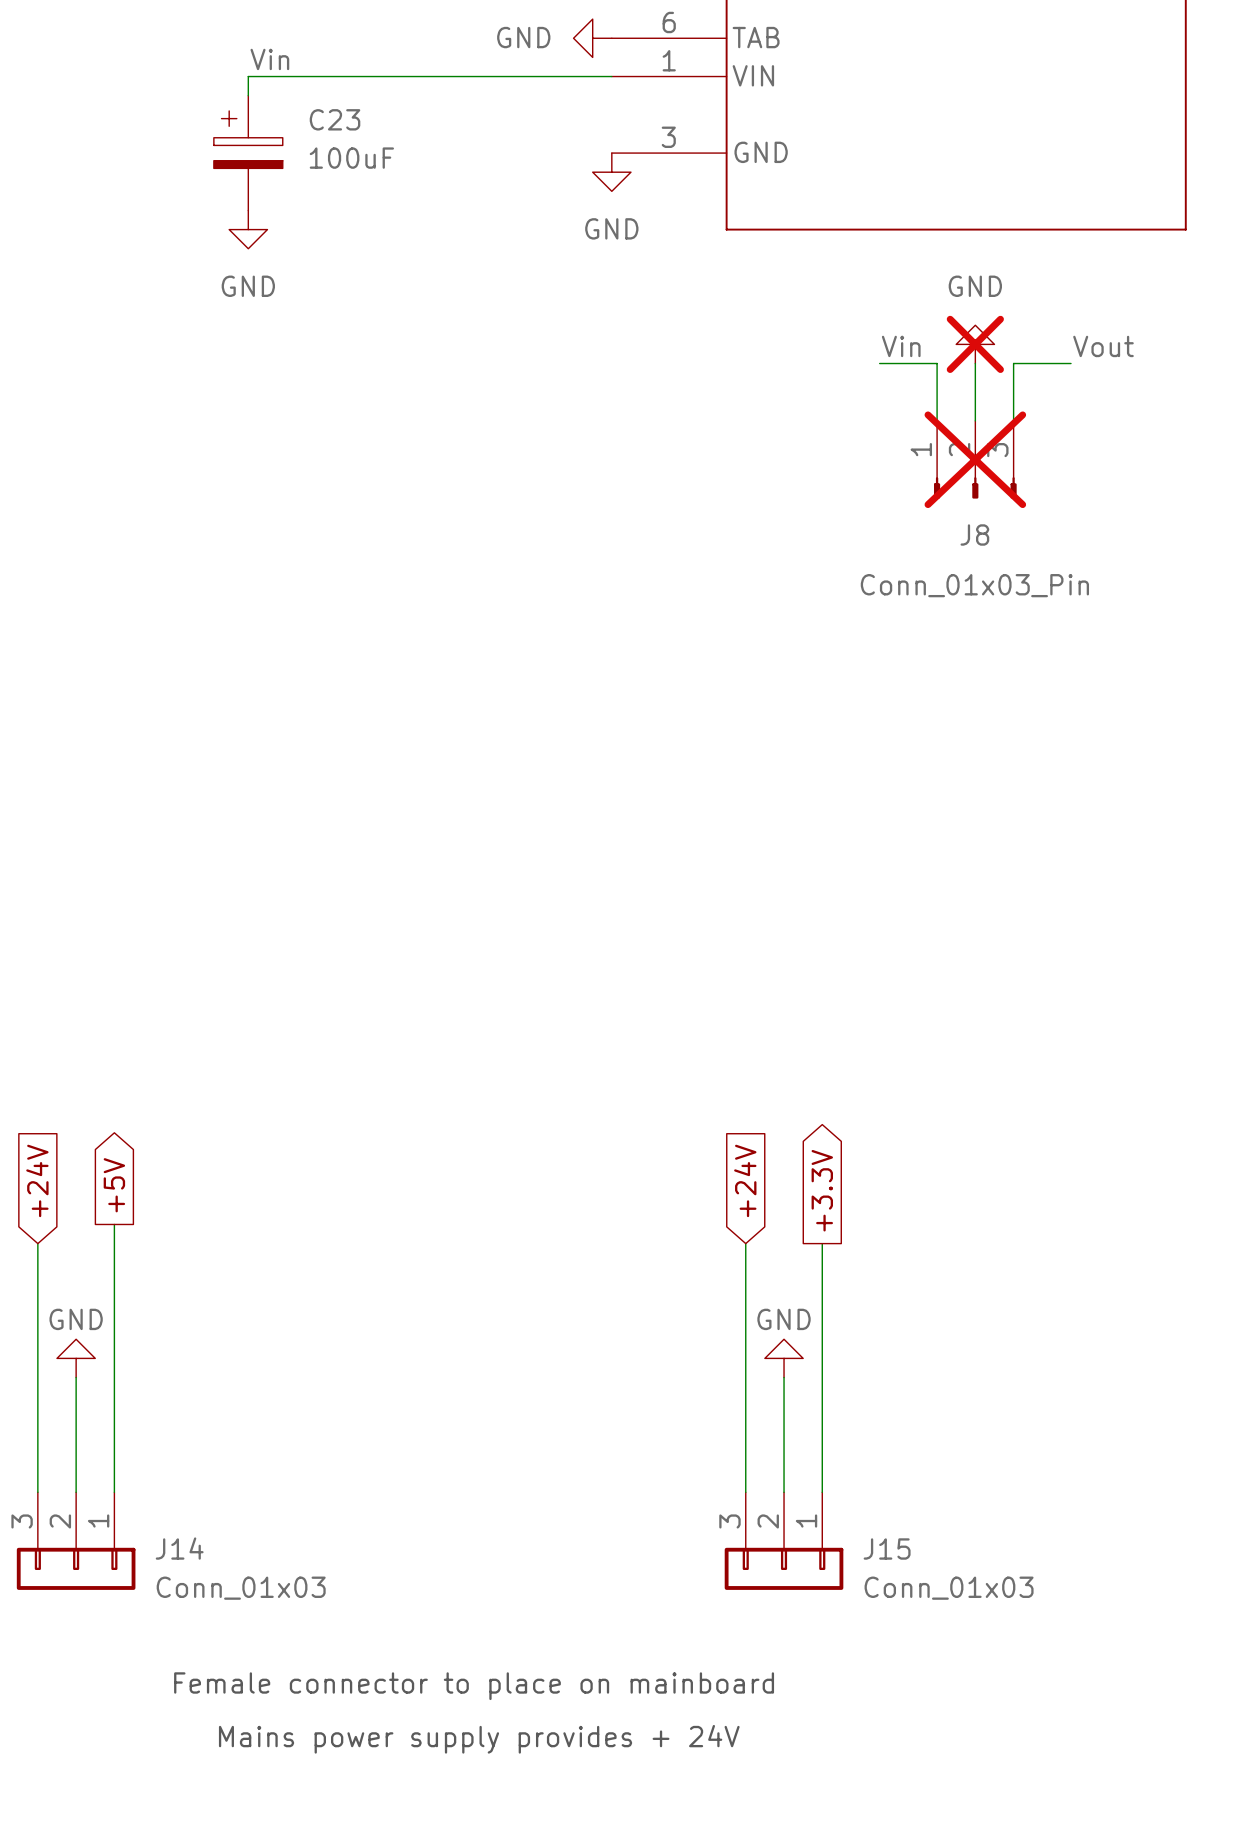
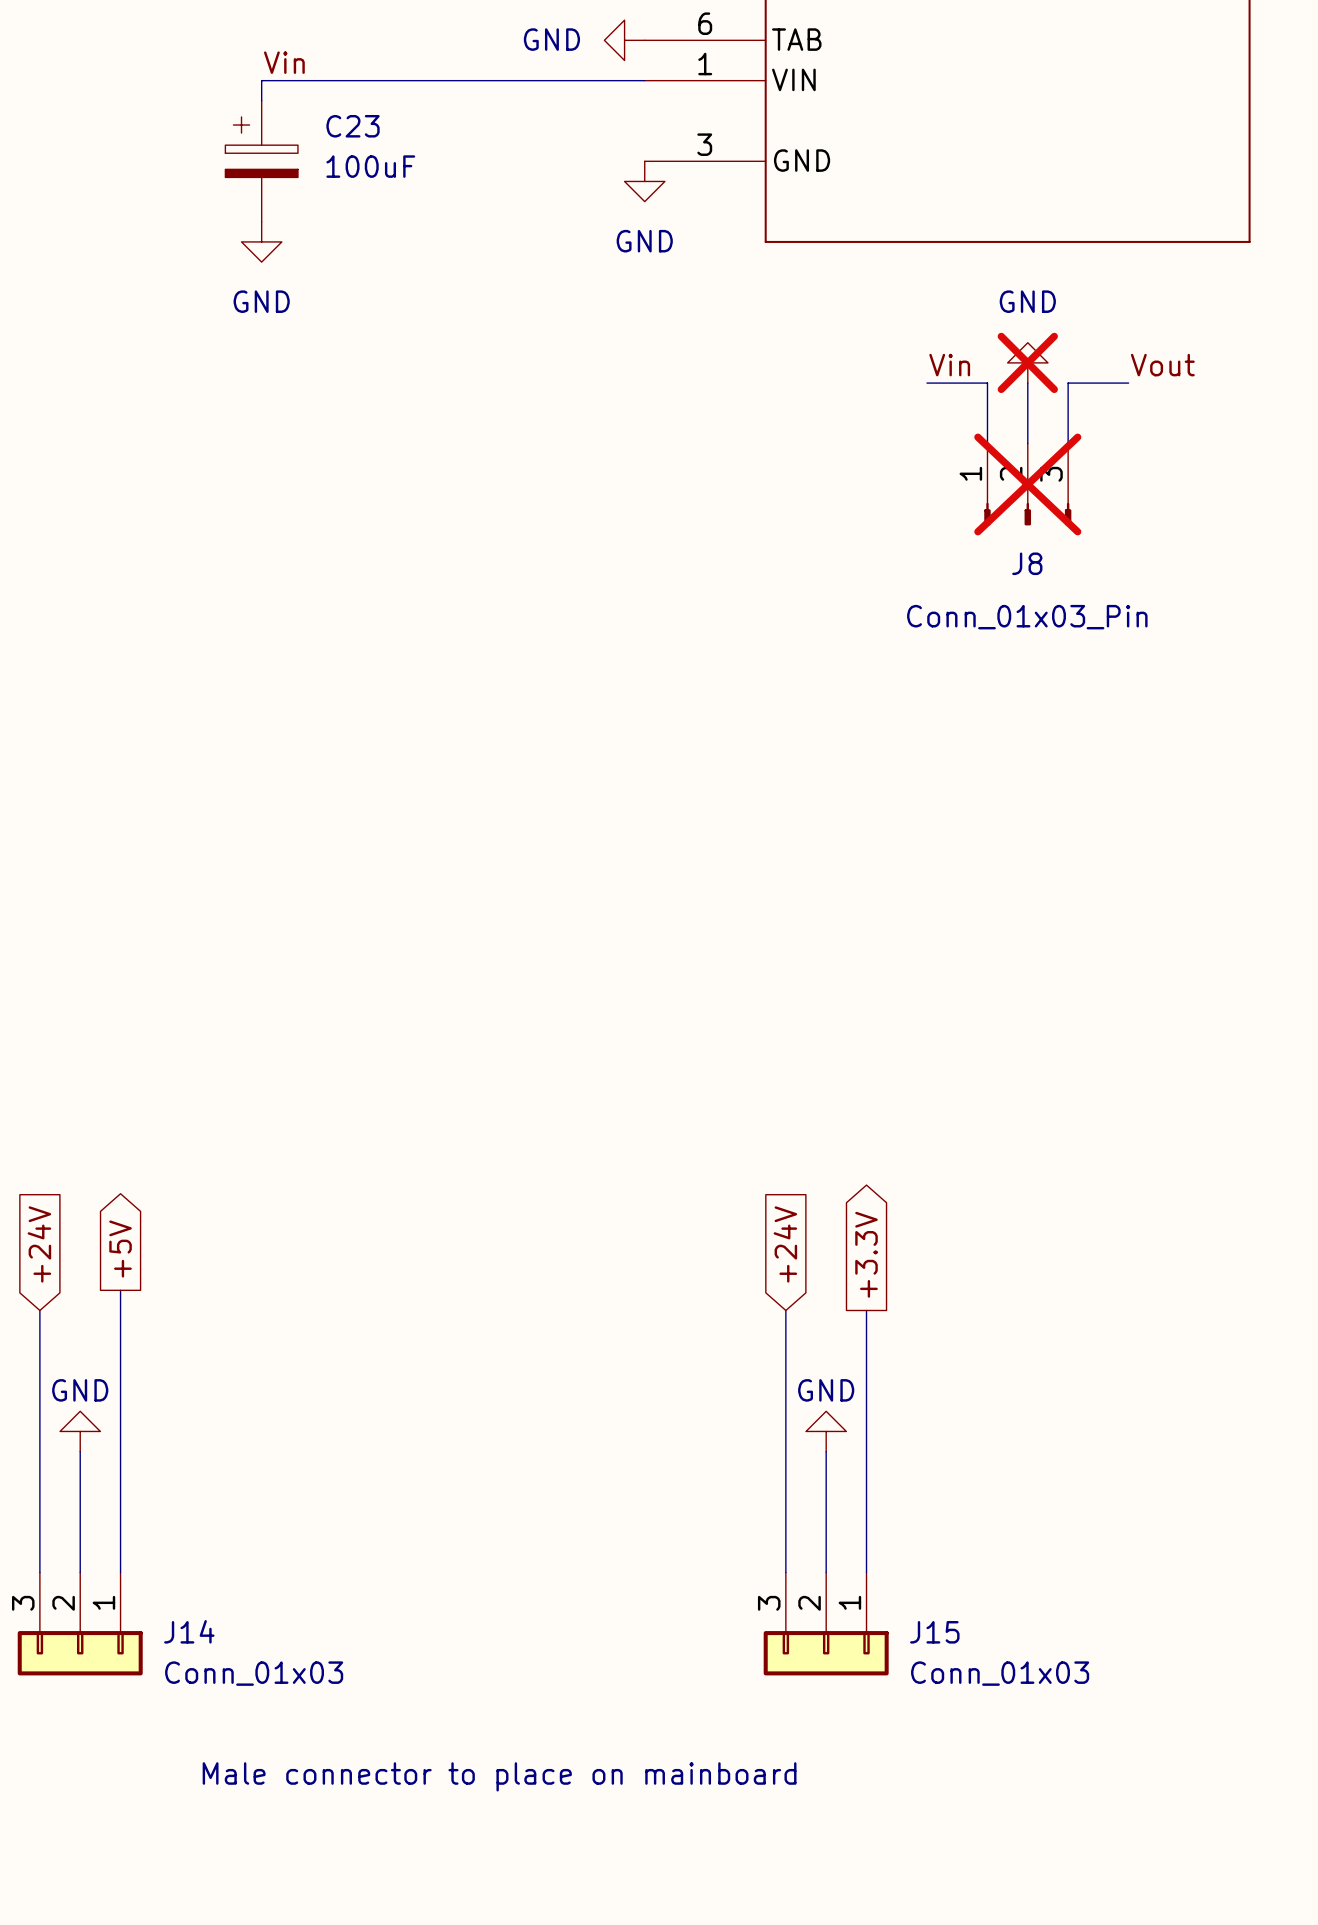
text: Female connector to place on mainboard (474, 1686) -> Male connector to place on mainboard (499, 1776)
text: Mains power supply provides + 24V (479, 1739) -> none

